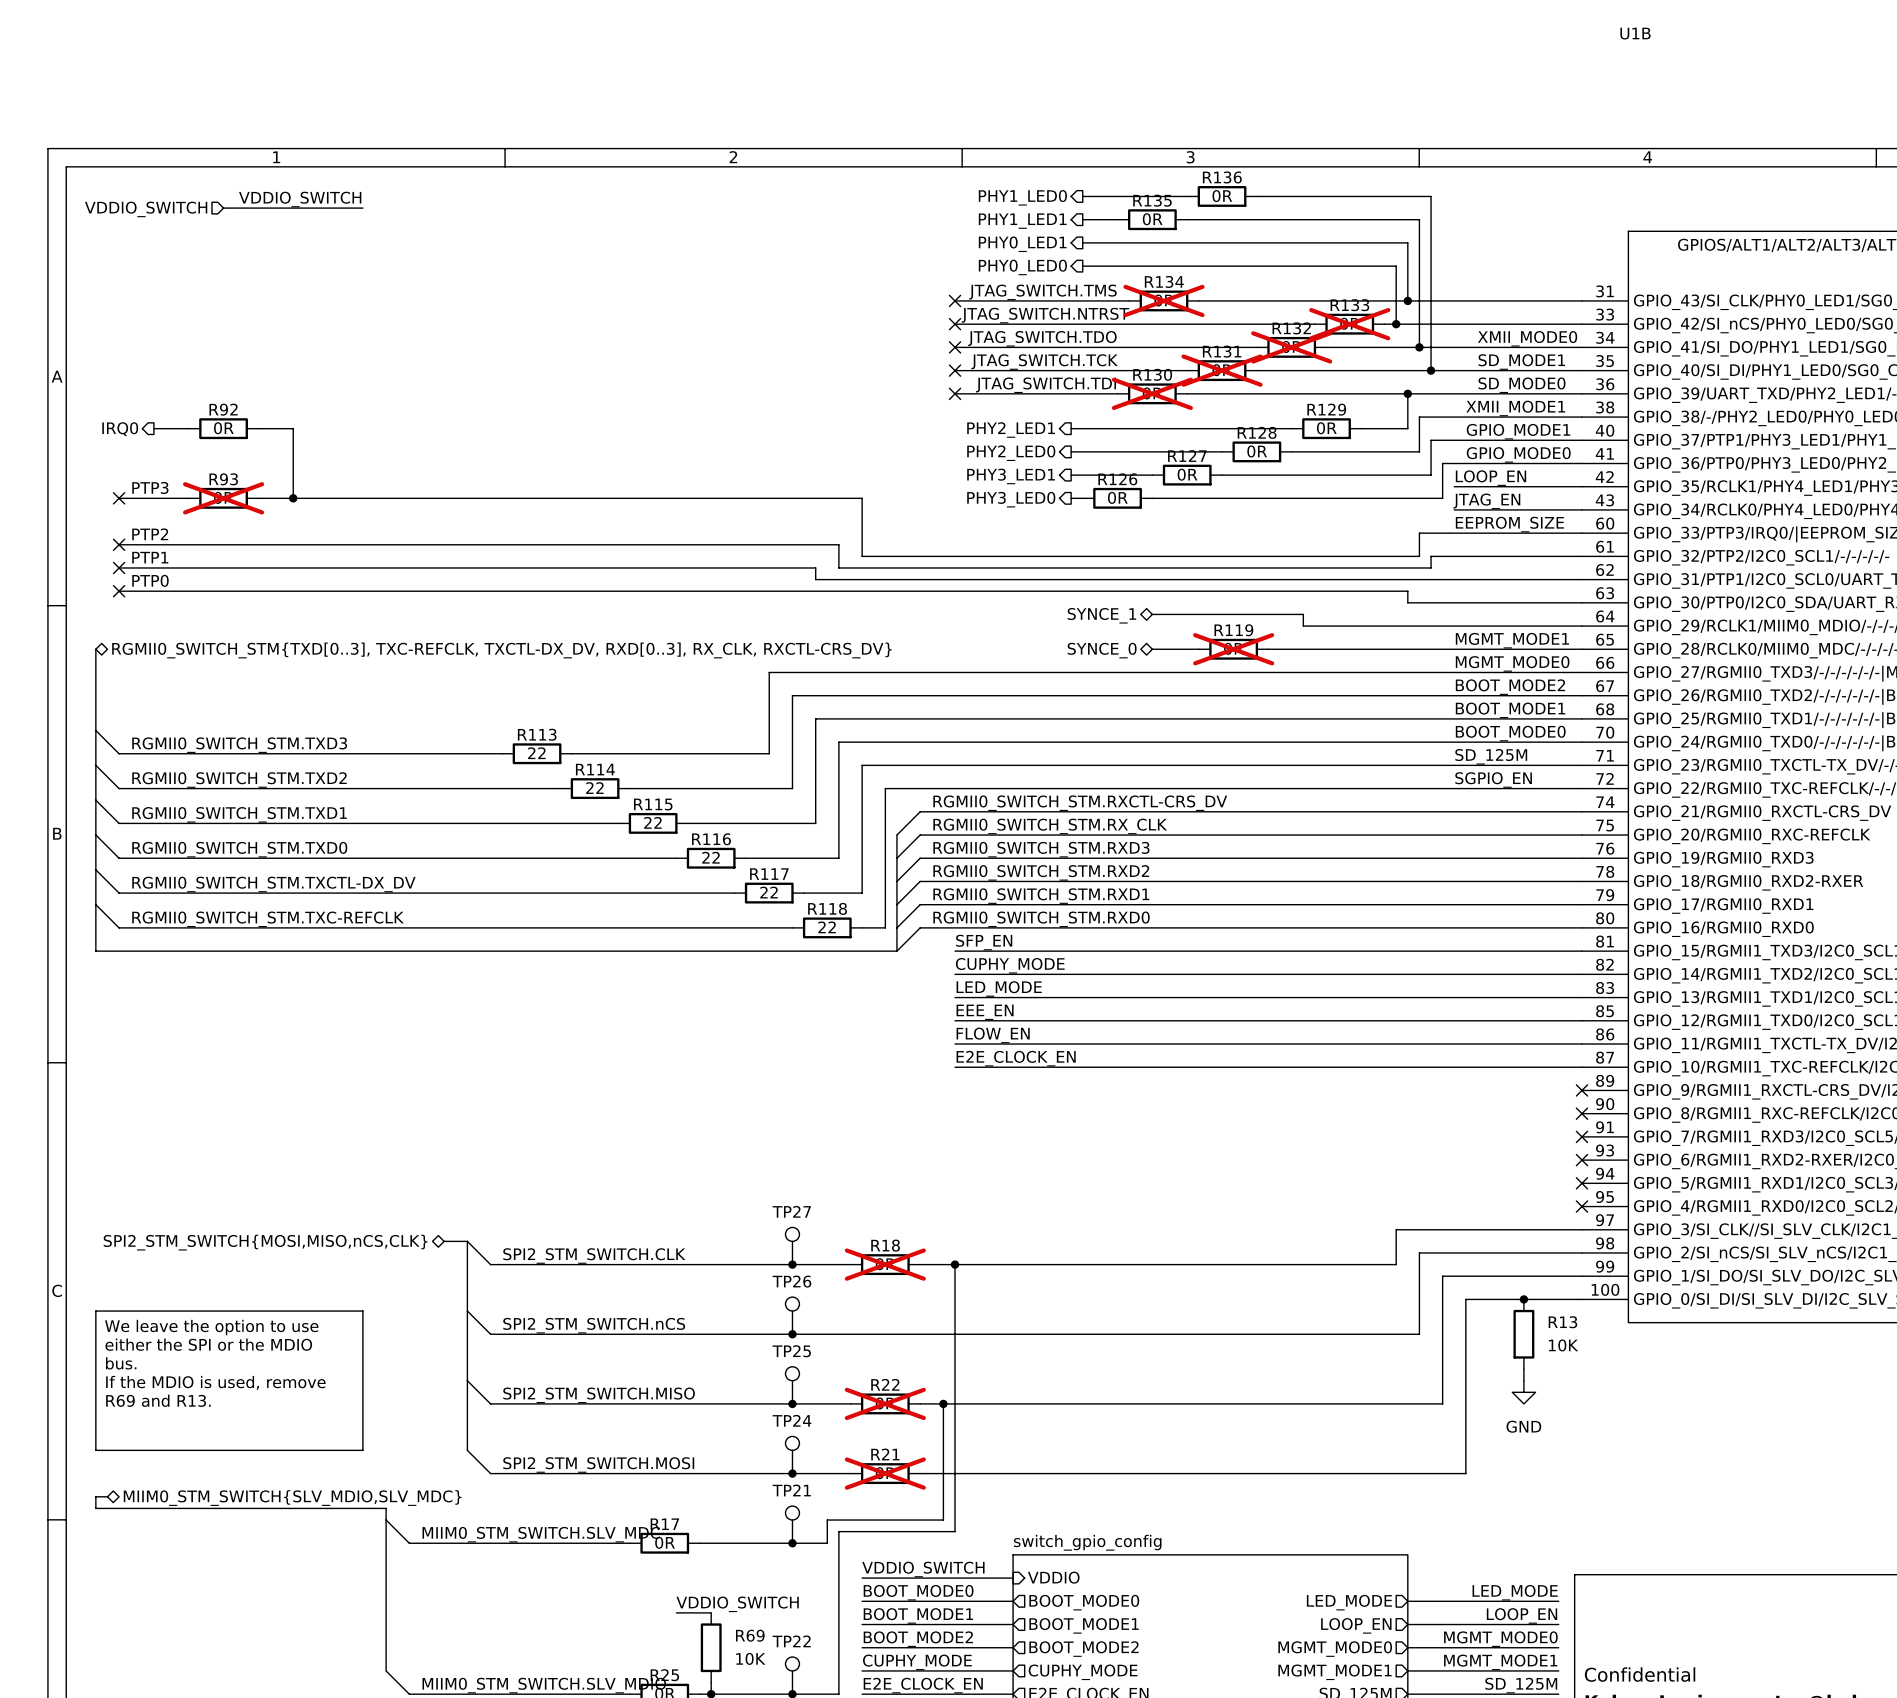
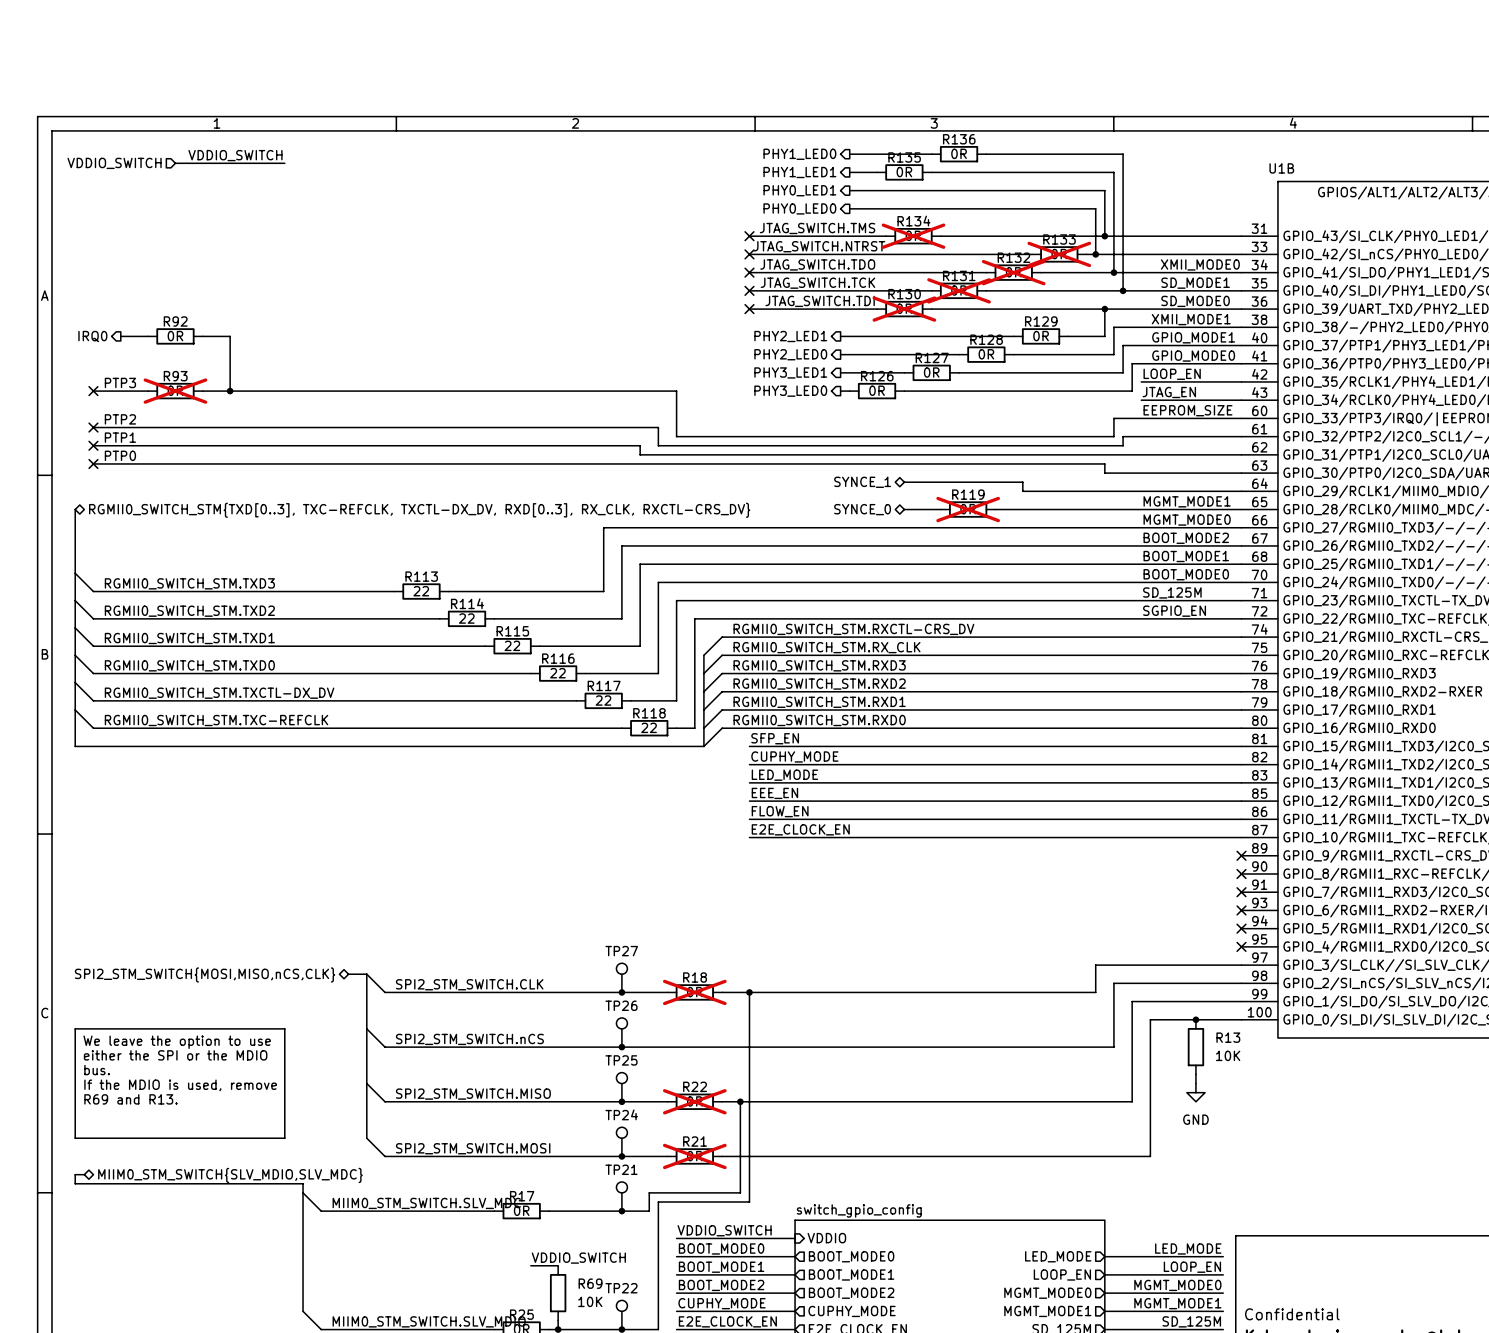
U1B name position: U1B (1635, 33) -> U1B (1281, 168)

